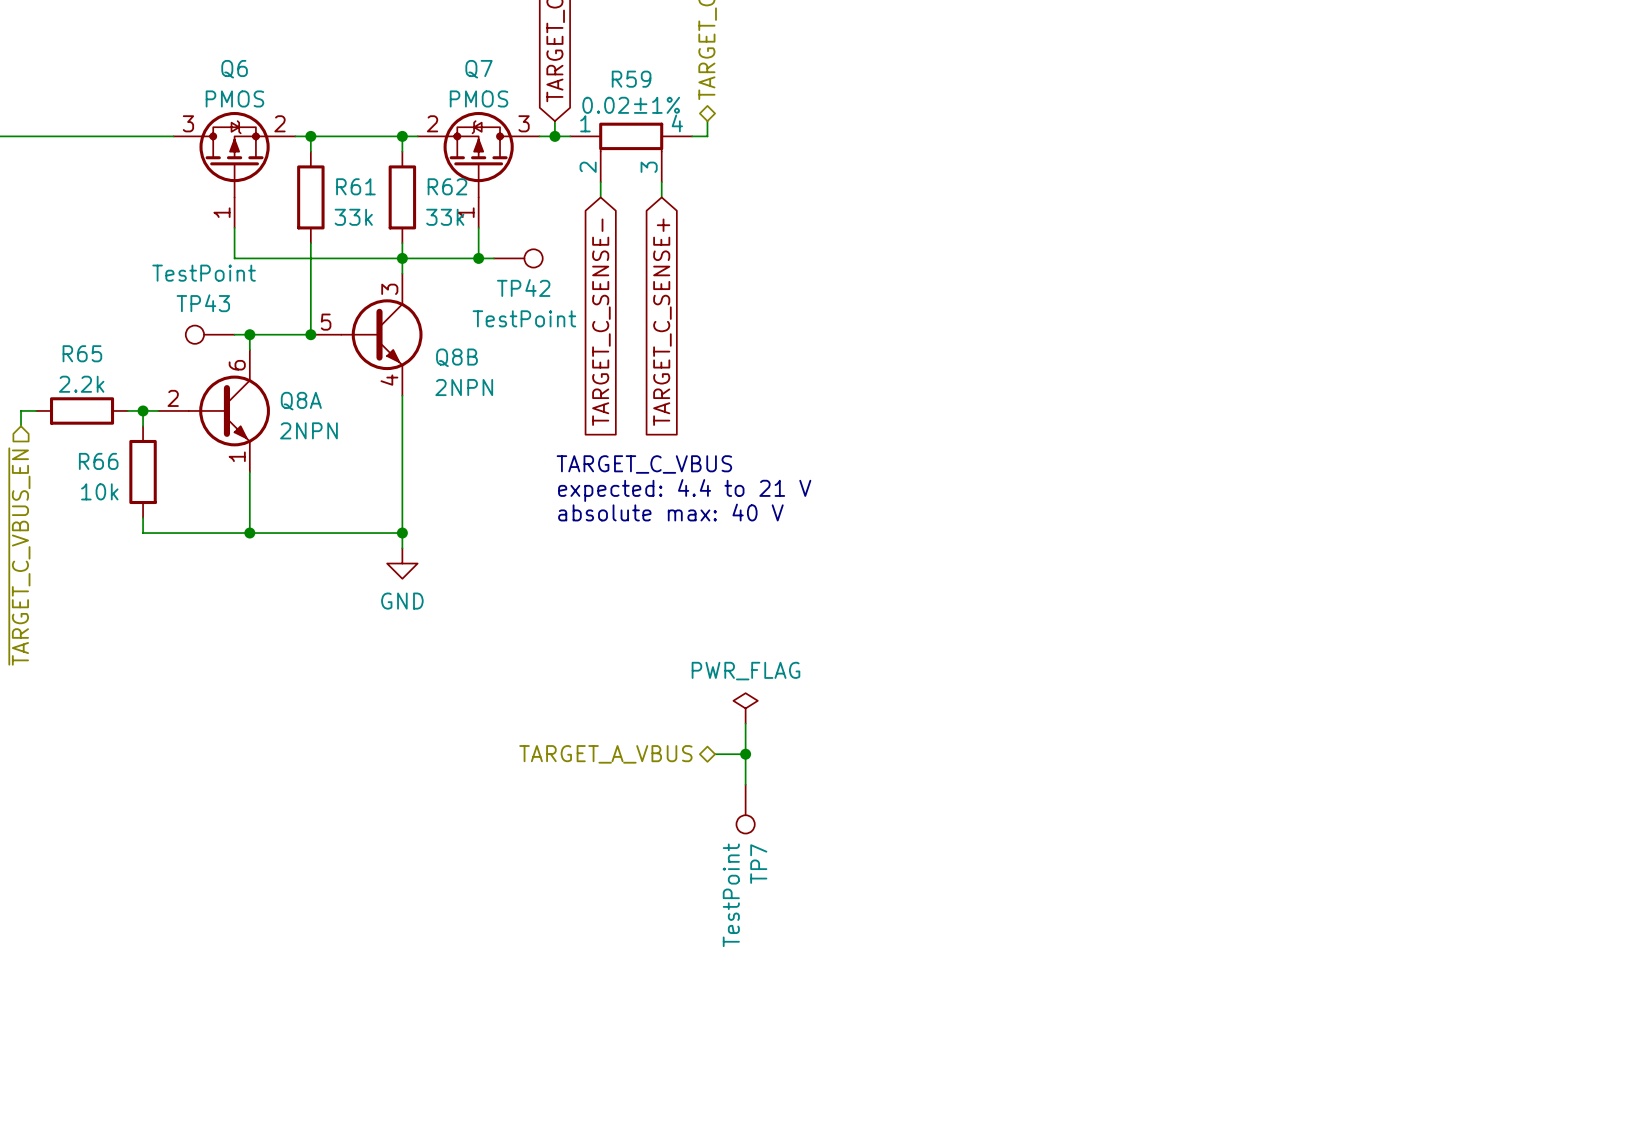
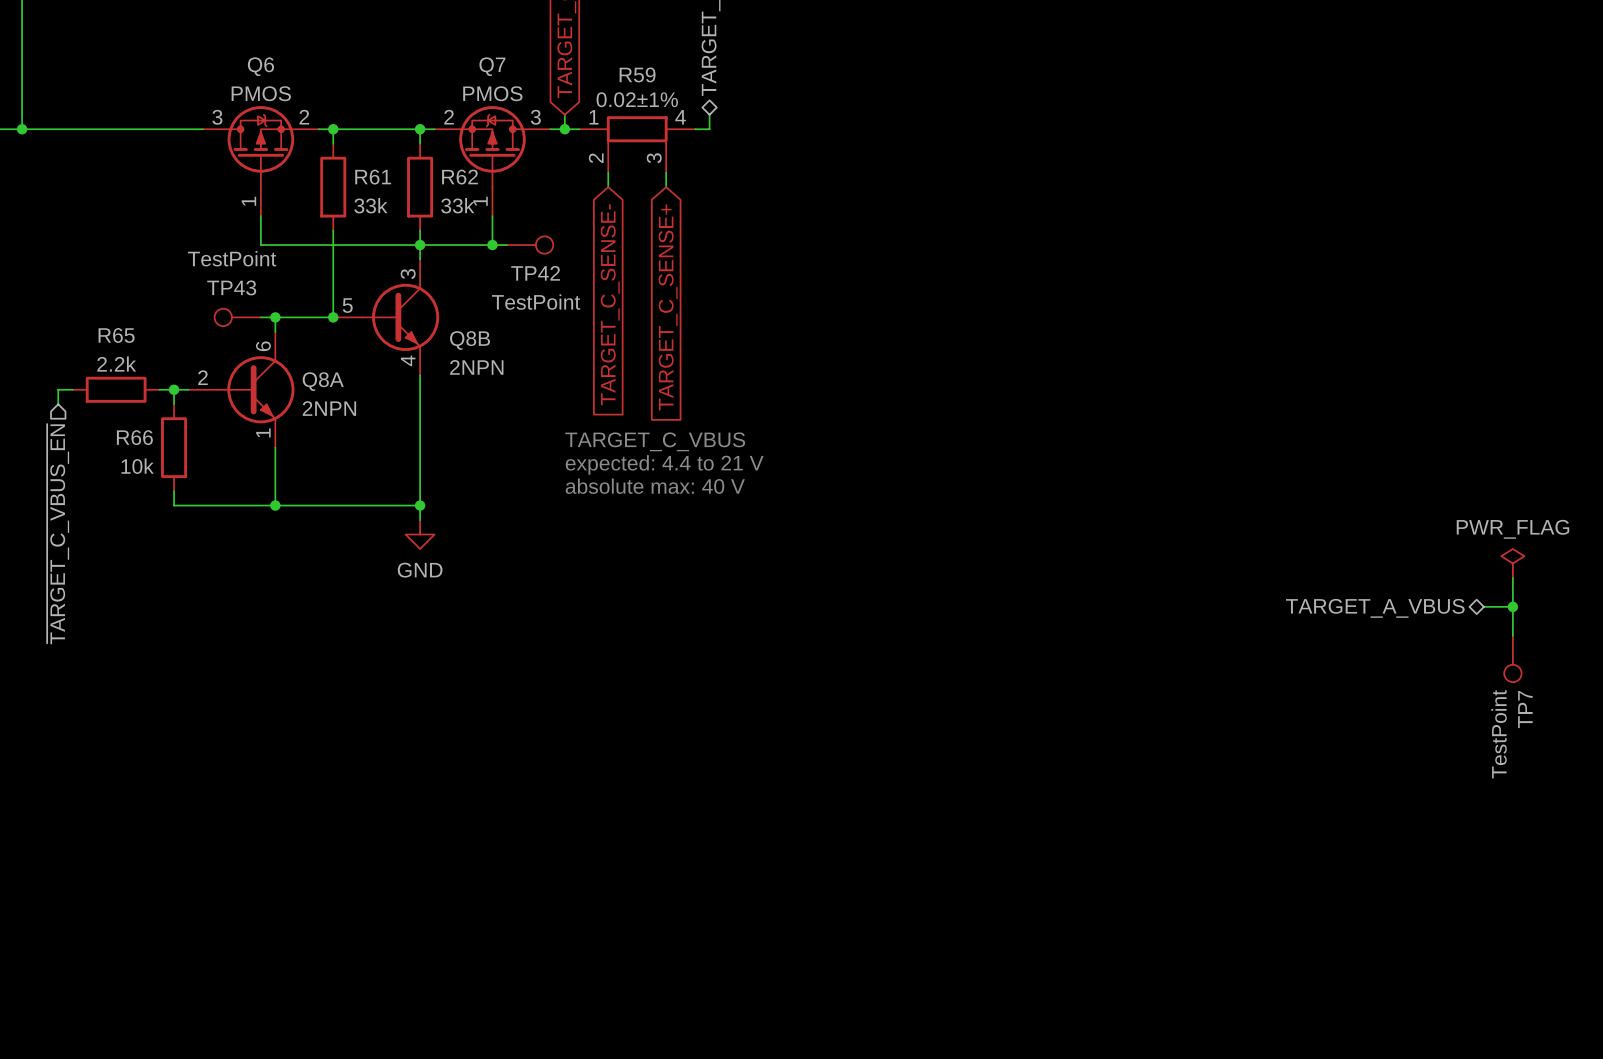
power symbol: none -> PWR_FLAG (1512, 563)
wire: none -> (1512, 577) (1512, 635)
hierarchical label: none -> TARGET_A_VBUS (1375, 608)
wire: none -> (1483, 606) (1512, 606)
junction: none -> (1512, 606)
power symbol: PWR_FLAG (745, 708) -> none
wire: (745, 723) (745, 784) -> none
hierarchical label: TARGET_A_VBUS (605, 754) -> none
wire: (715, 754) (745, 754) -> none
junction: (745, 754) -> none
TP7 position: (745, 809) -> (1512, 658)

